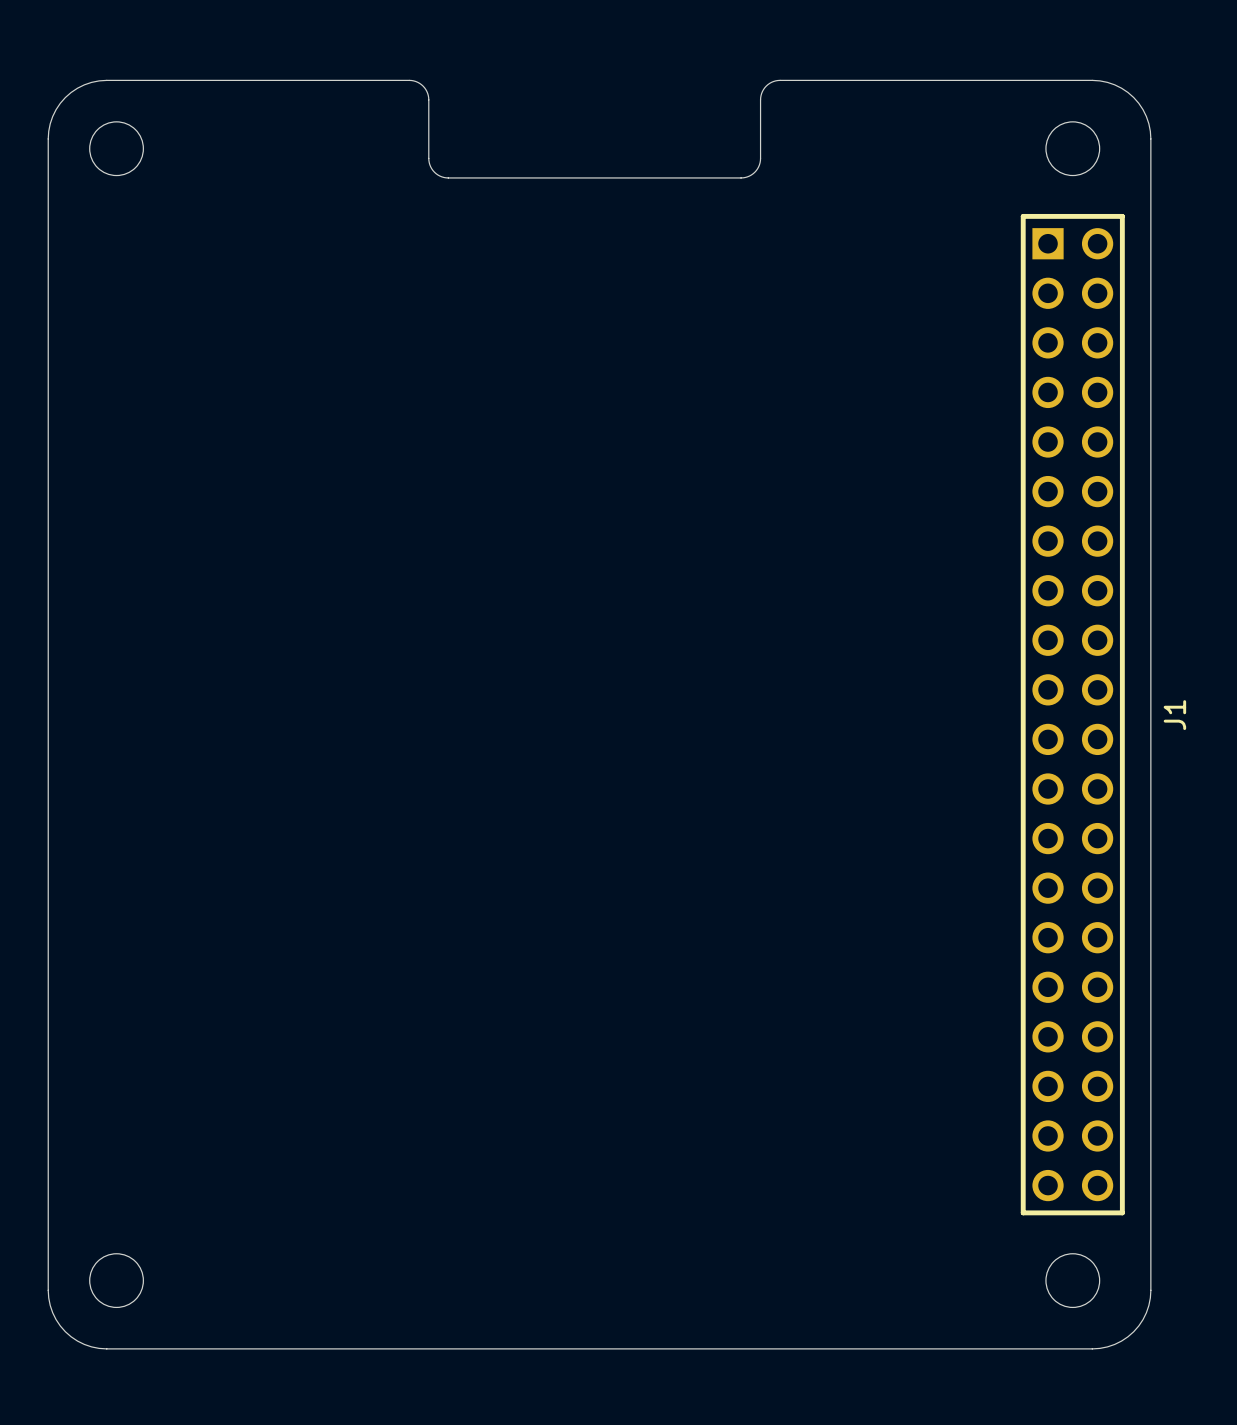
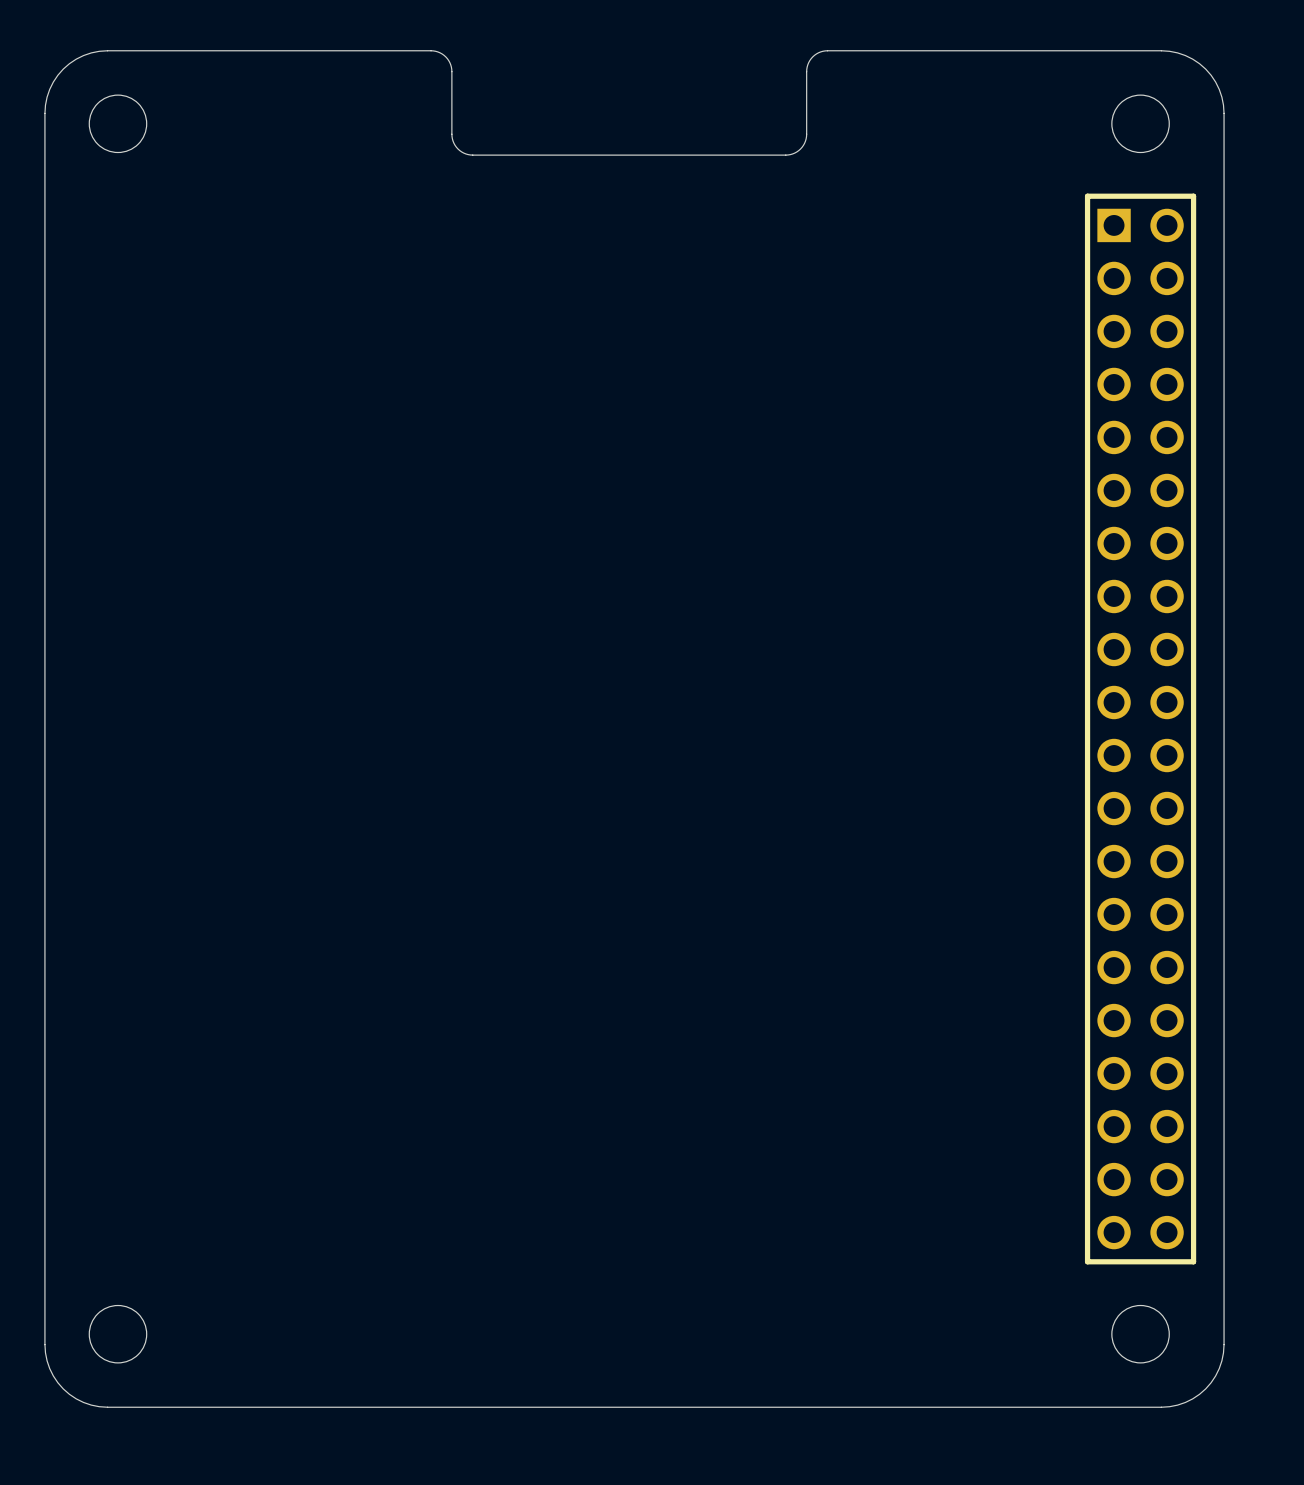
J1 name: J1 (1174, 715) -> none

